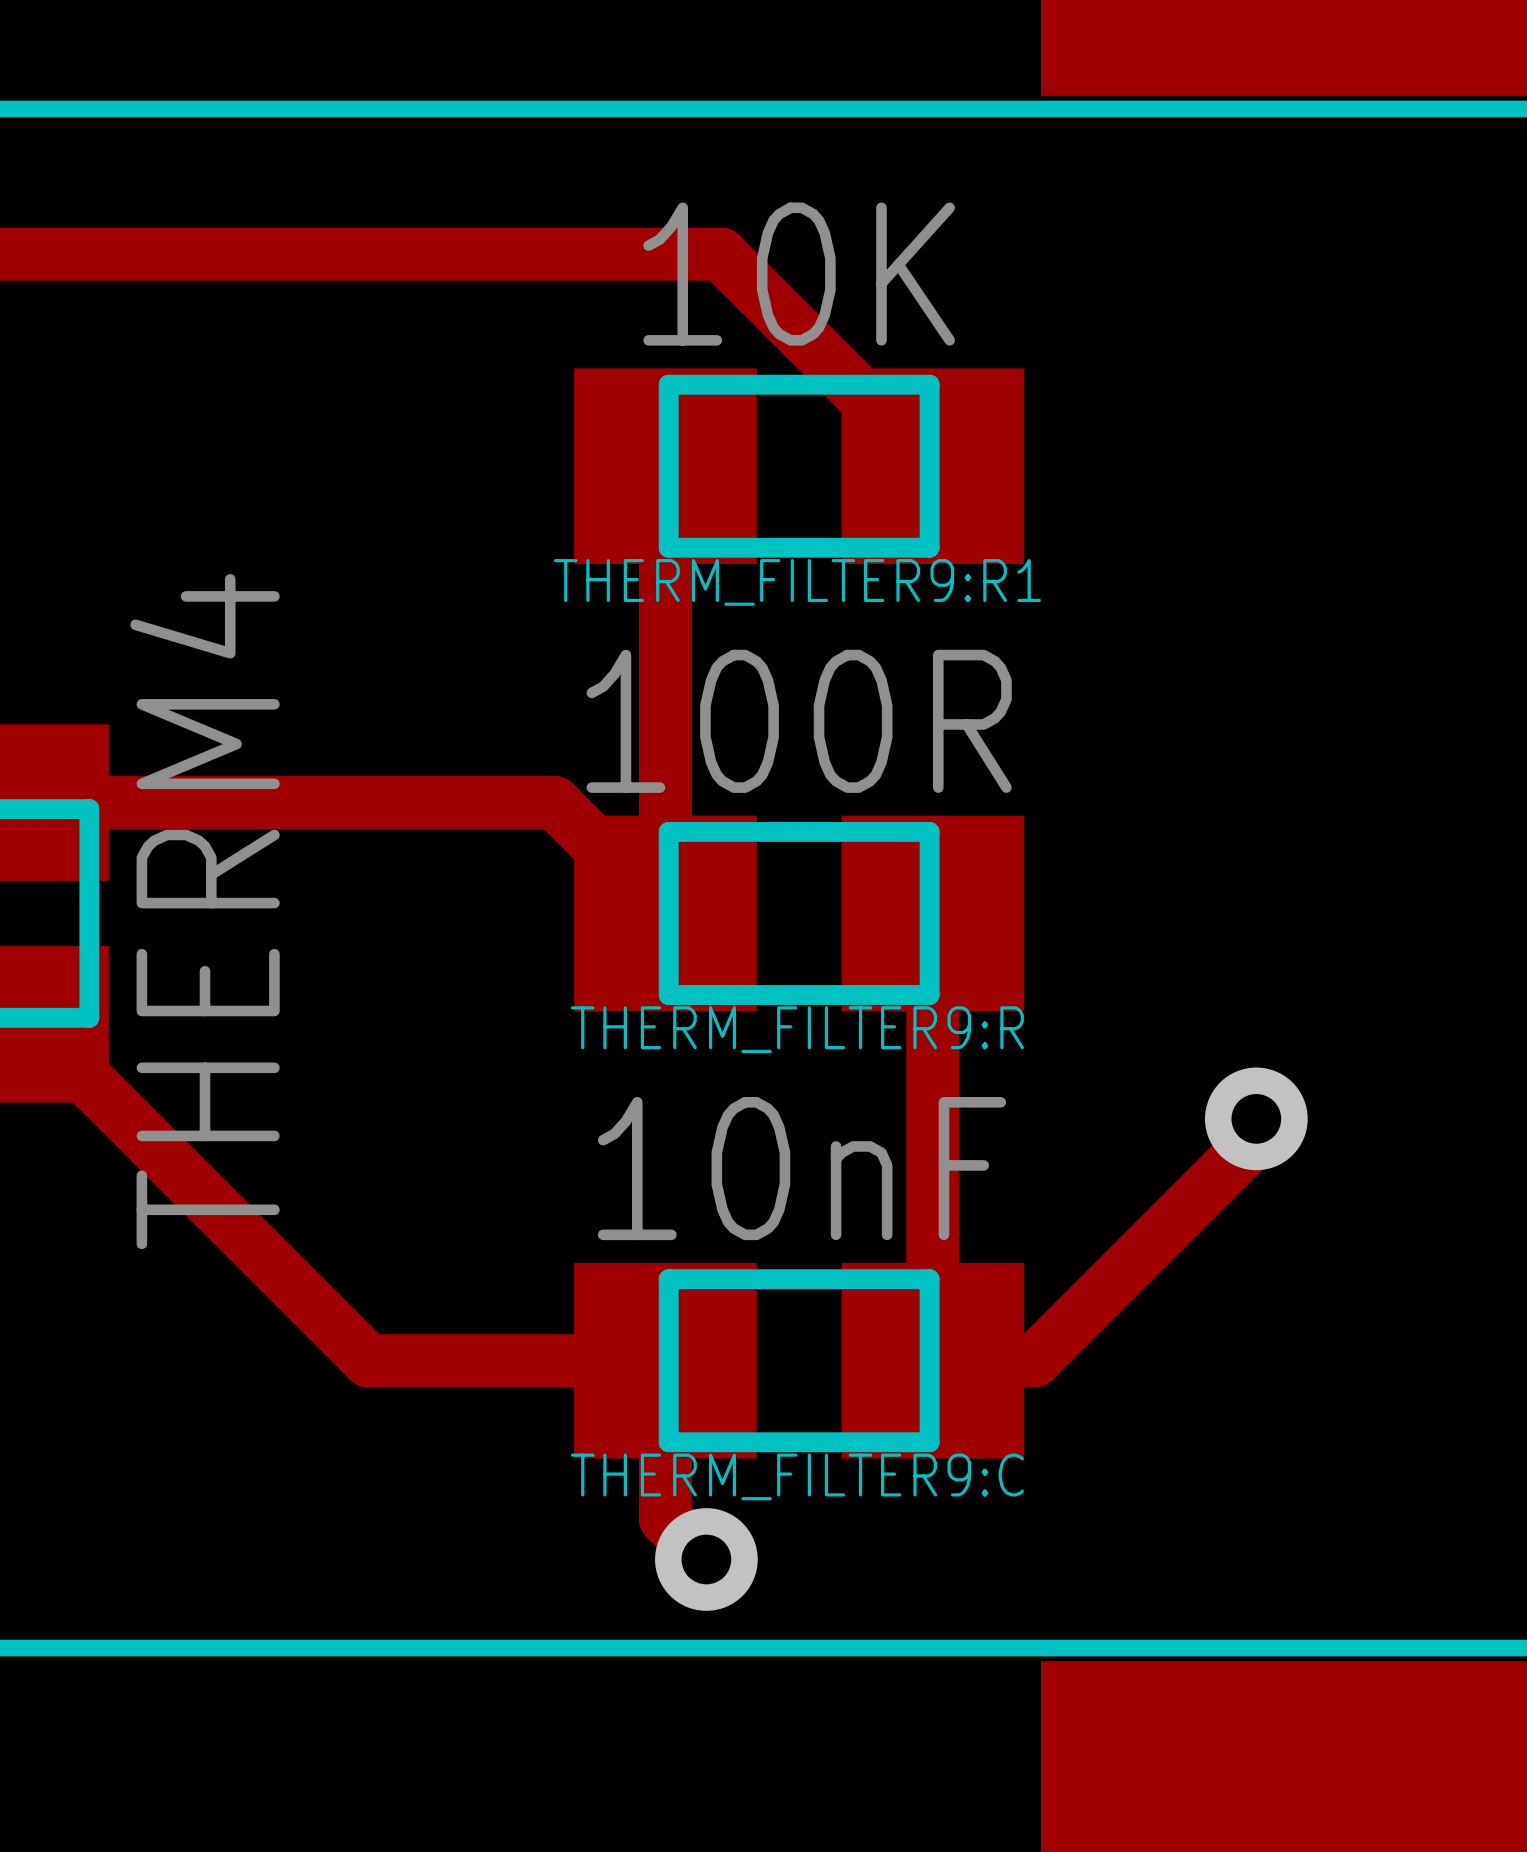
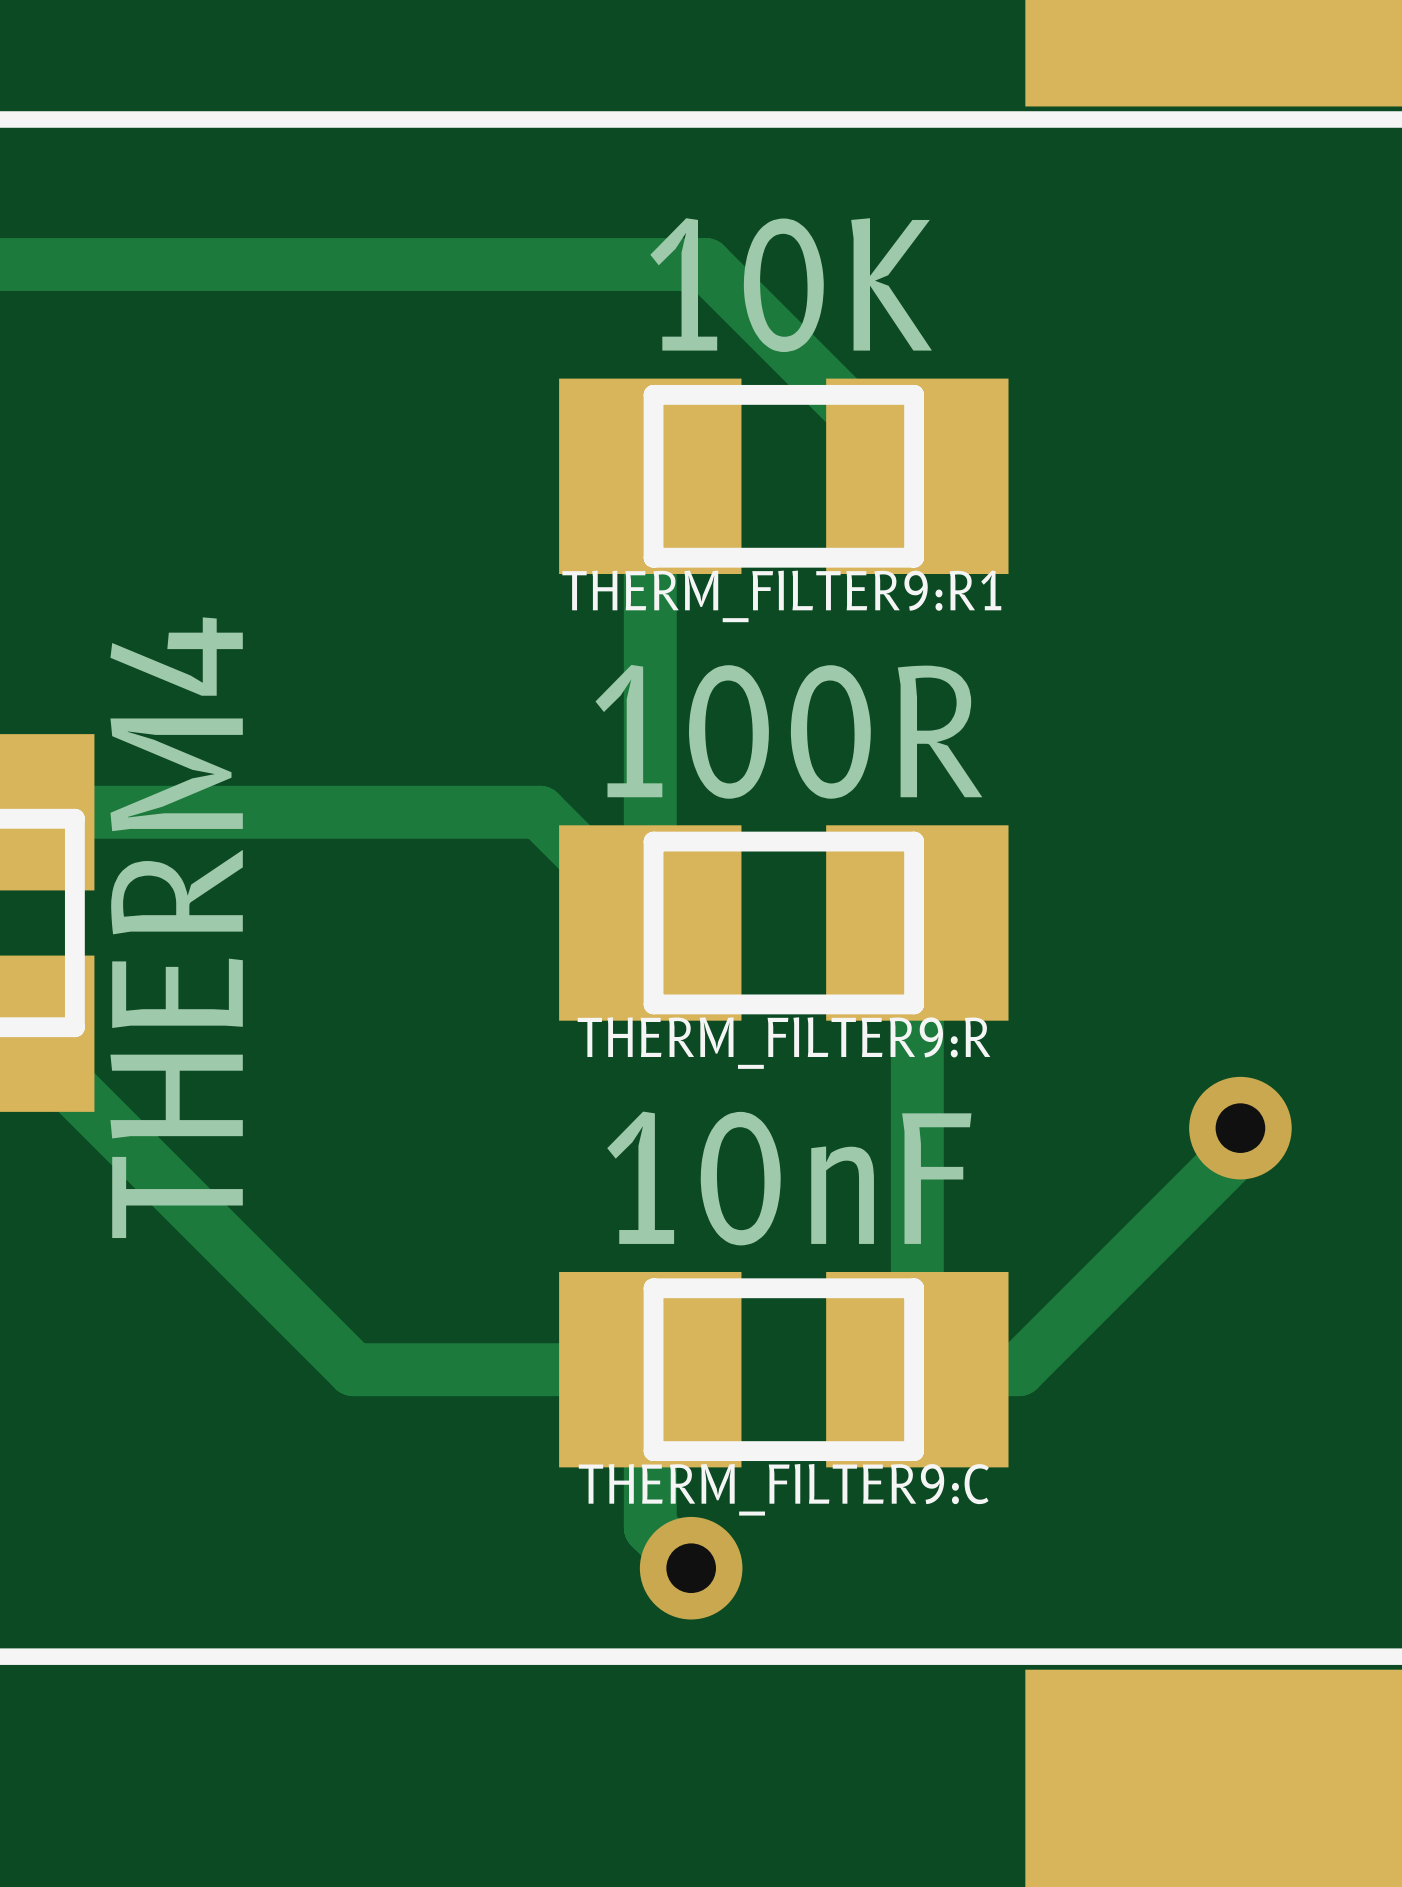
THERM4 name position: THERM4 (205, 911) -> THERM4 (176, 927)

